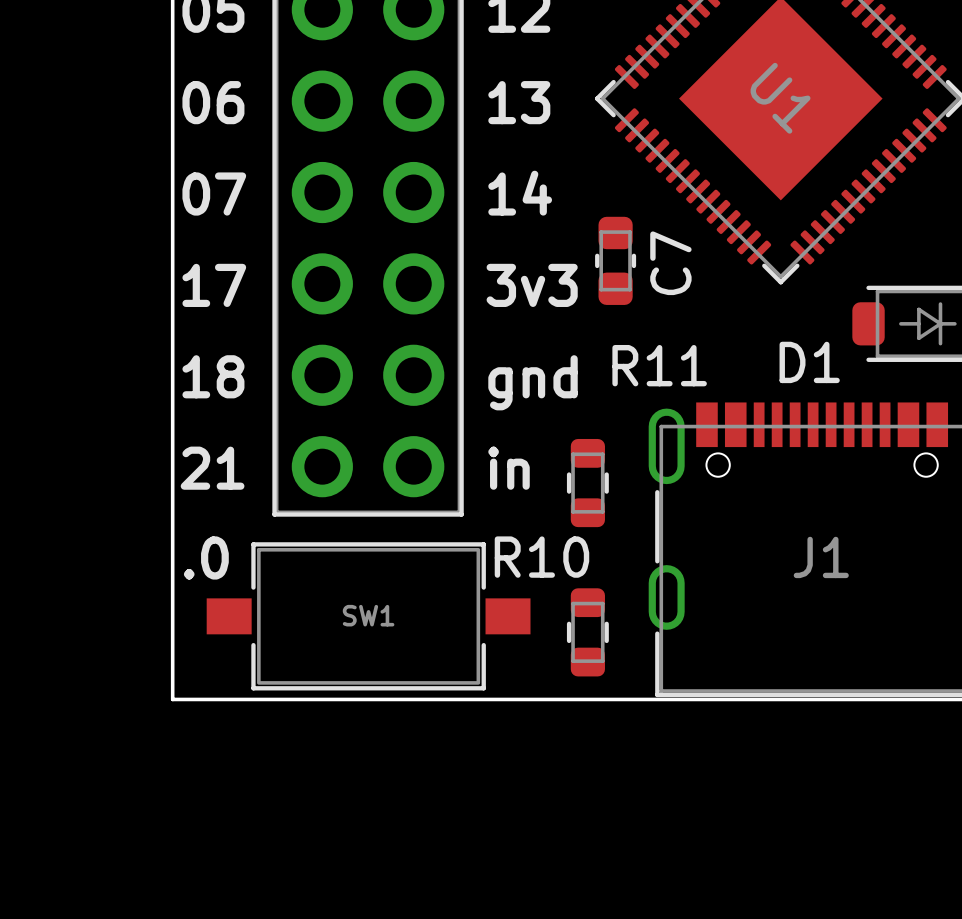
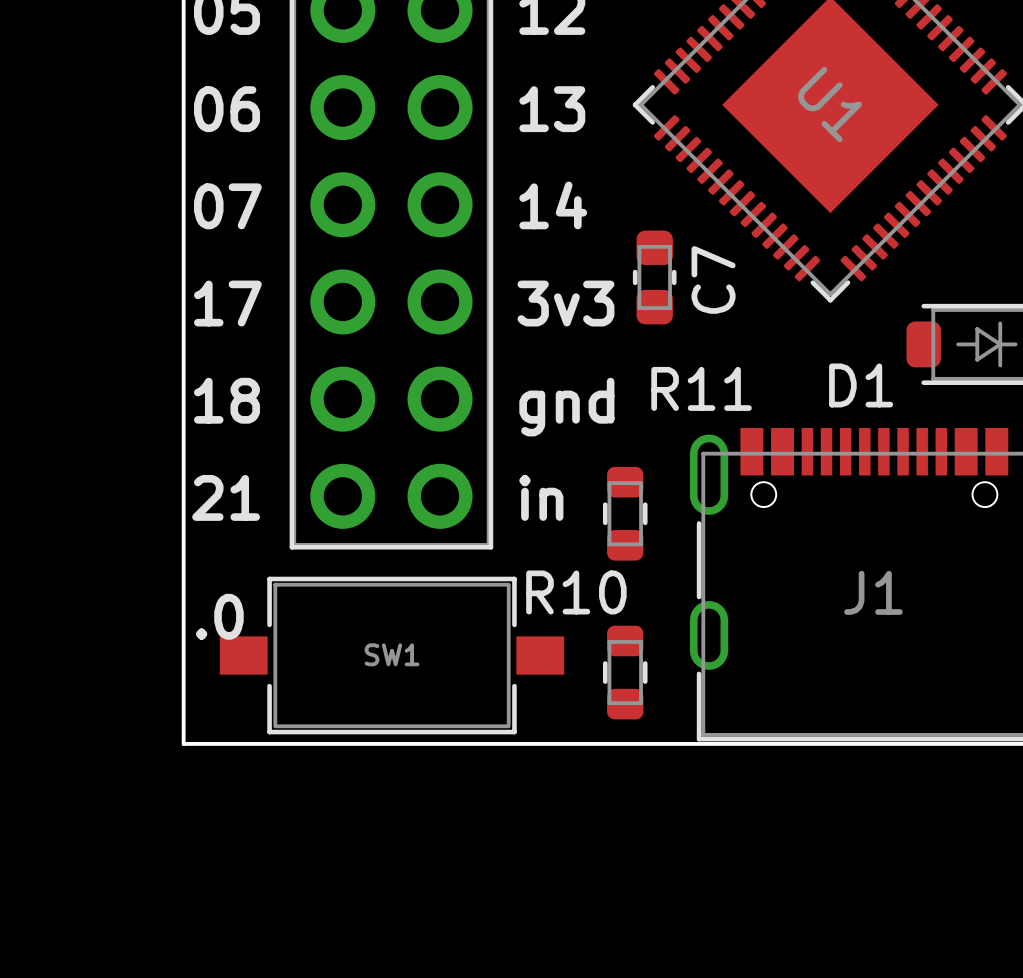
text position: .0 (206, 557) -> .0 (219, 616)

